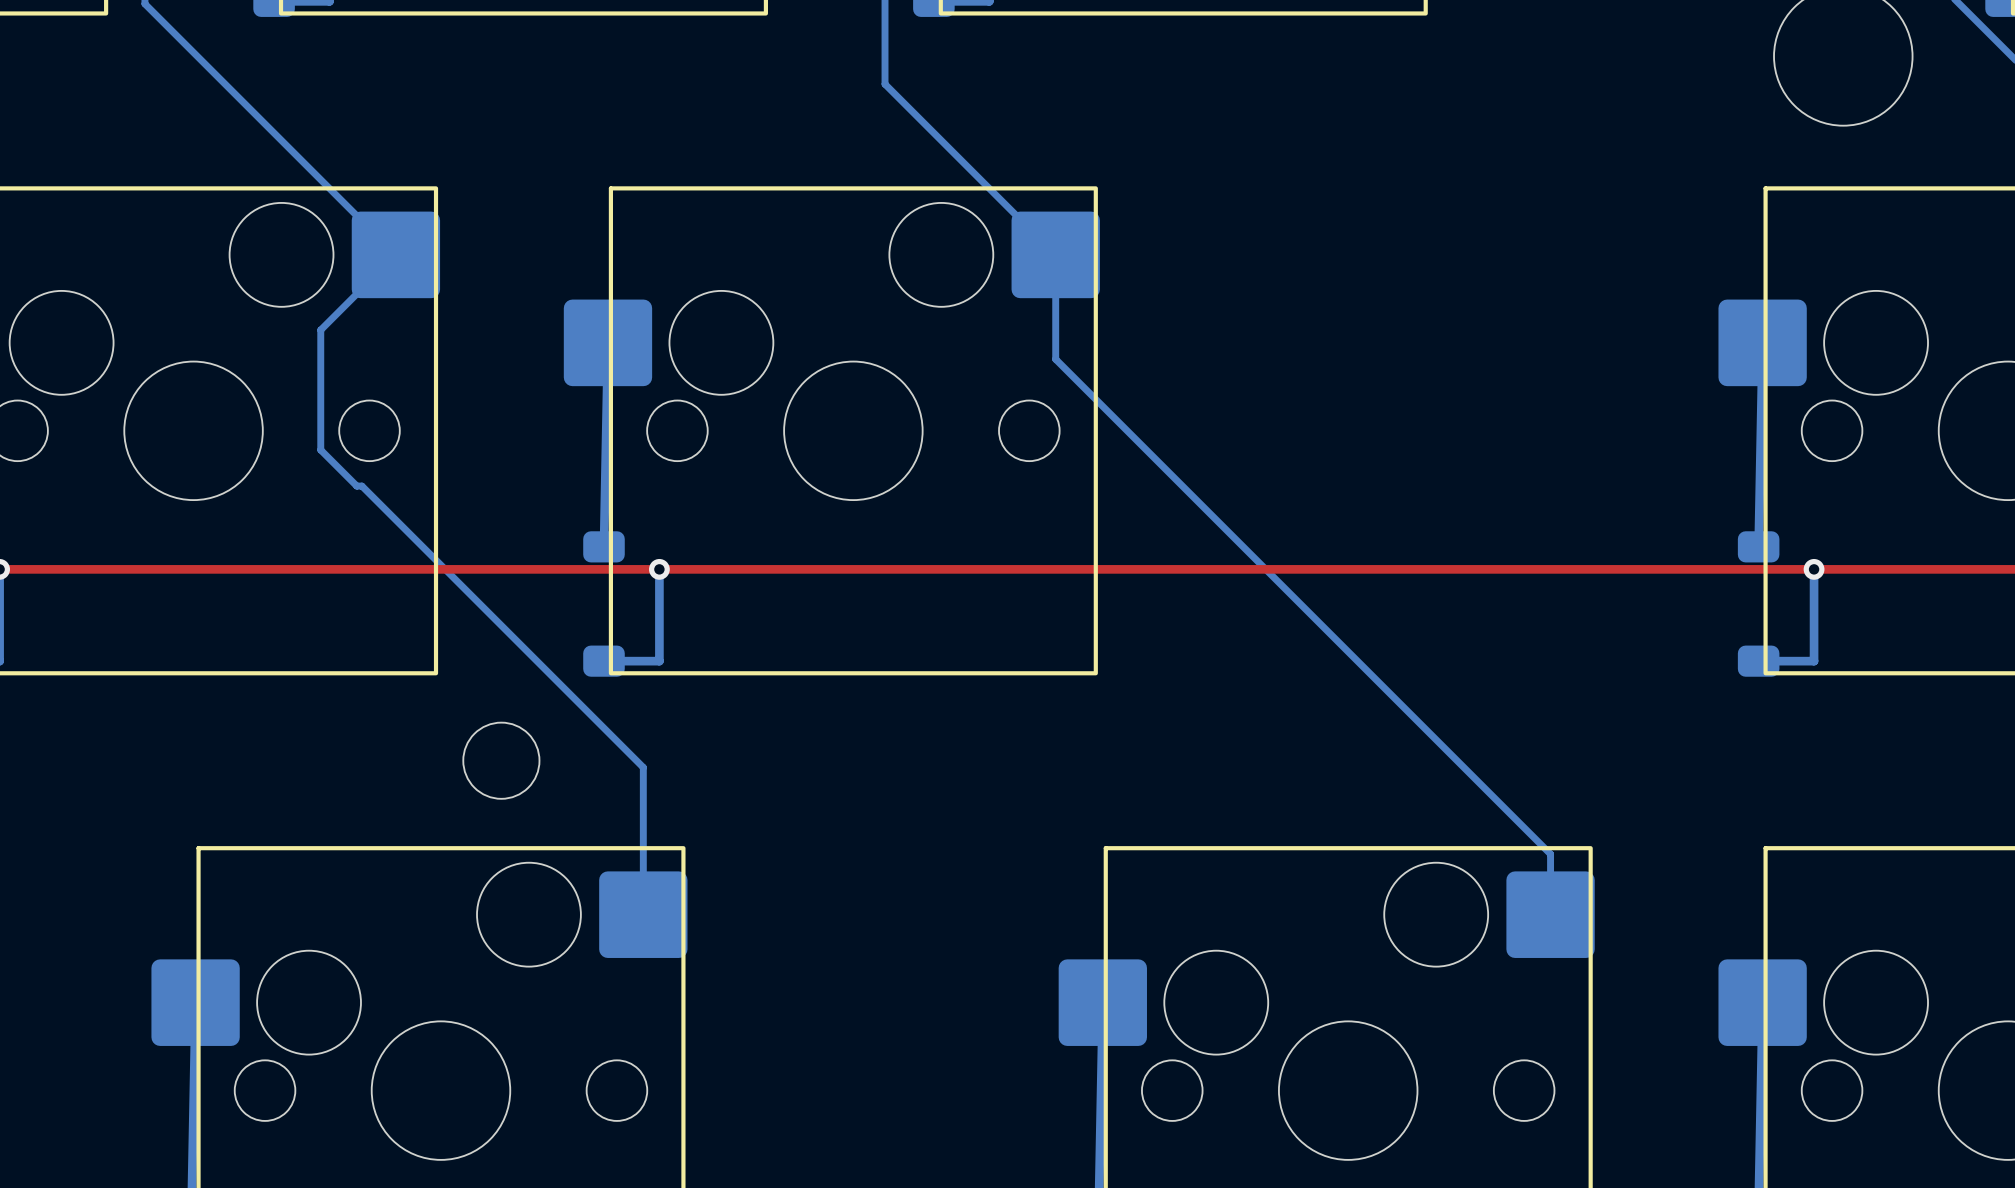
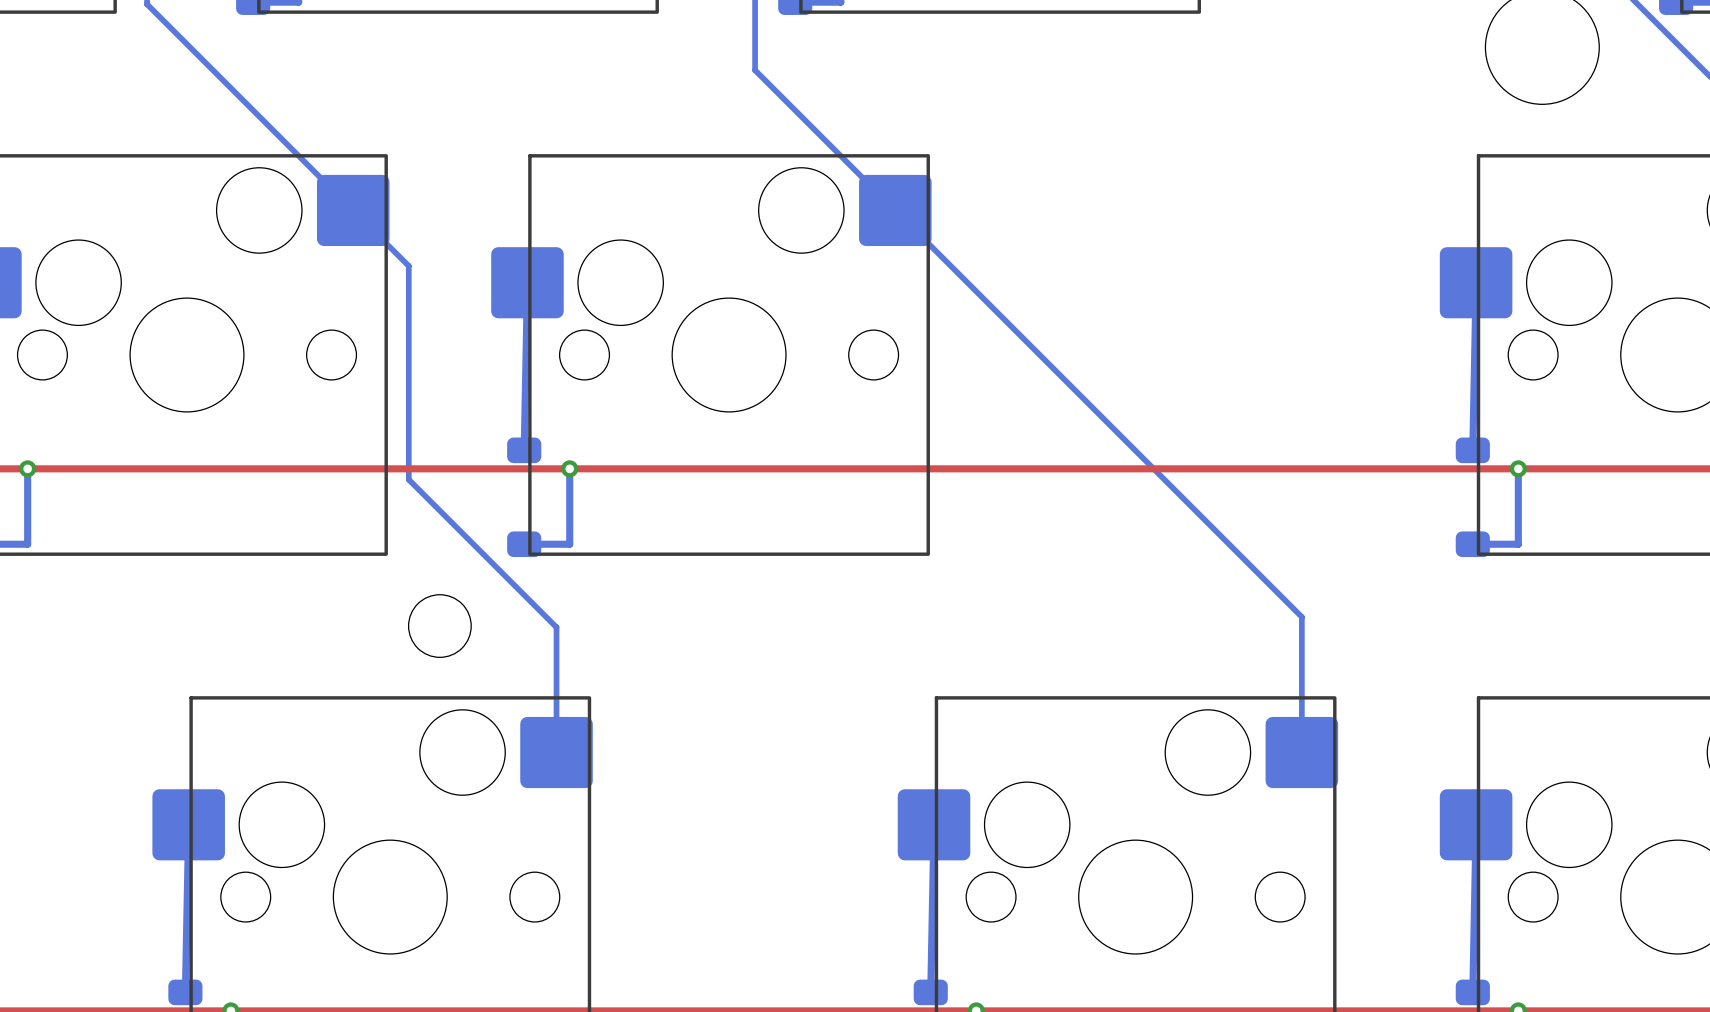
bottom track: (395, 254) (320, 330) (320, 450) (356, 486) (361, 486) (643, 767) -> (353, 210) (408, 265) (408, 479) (556, 627) (556, 631)
bottom track: (1055, 254) (1055, 359) (1550, 854) -> (895, 210) (1301, 617) (1301, 702)

